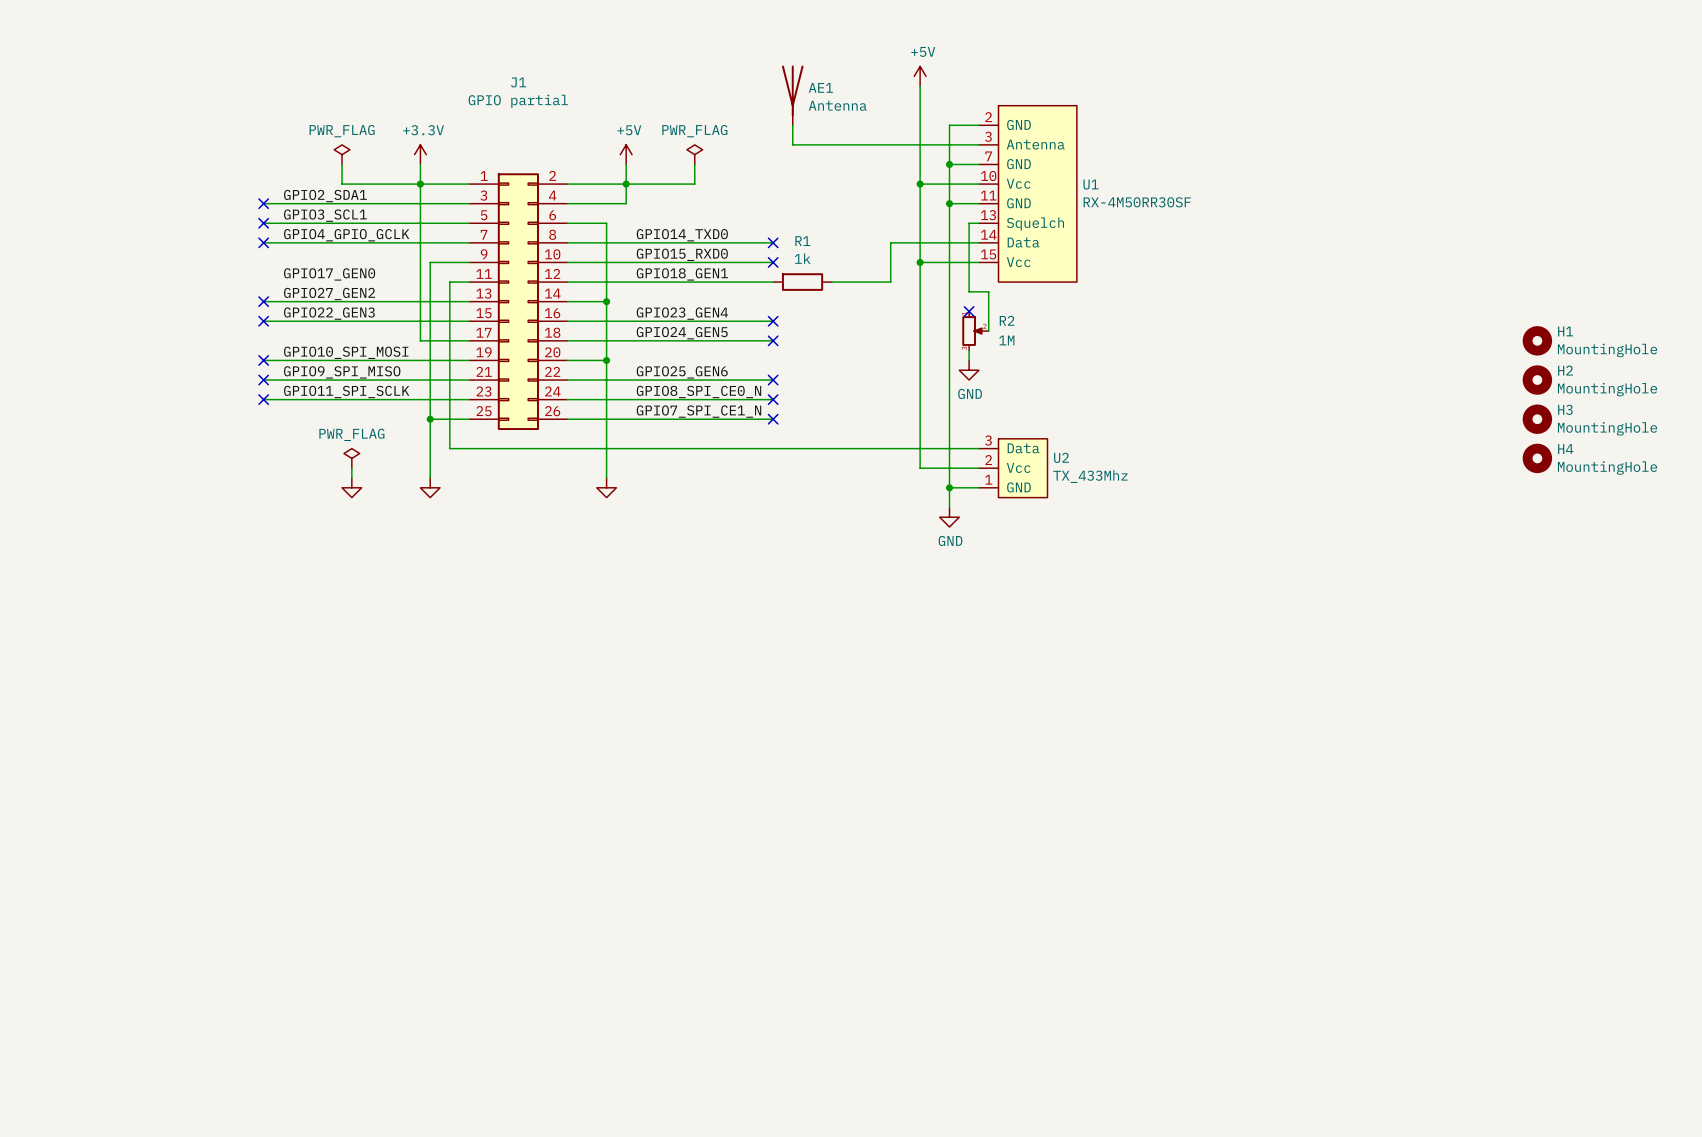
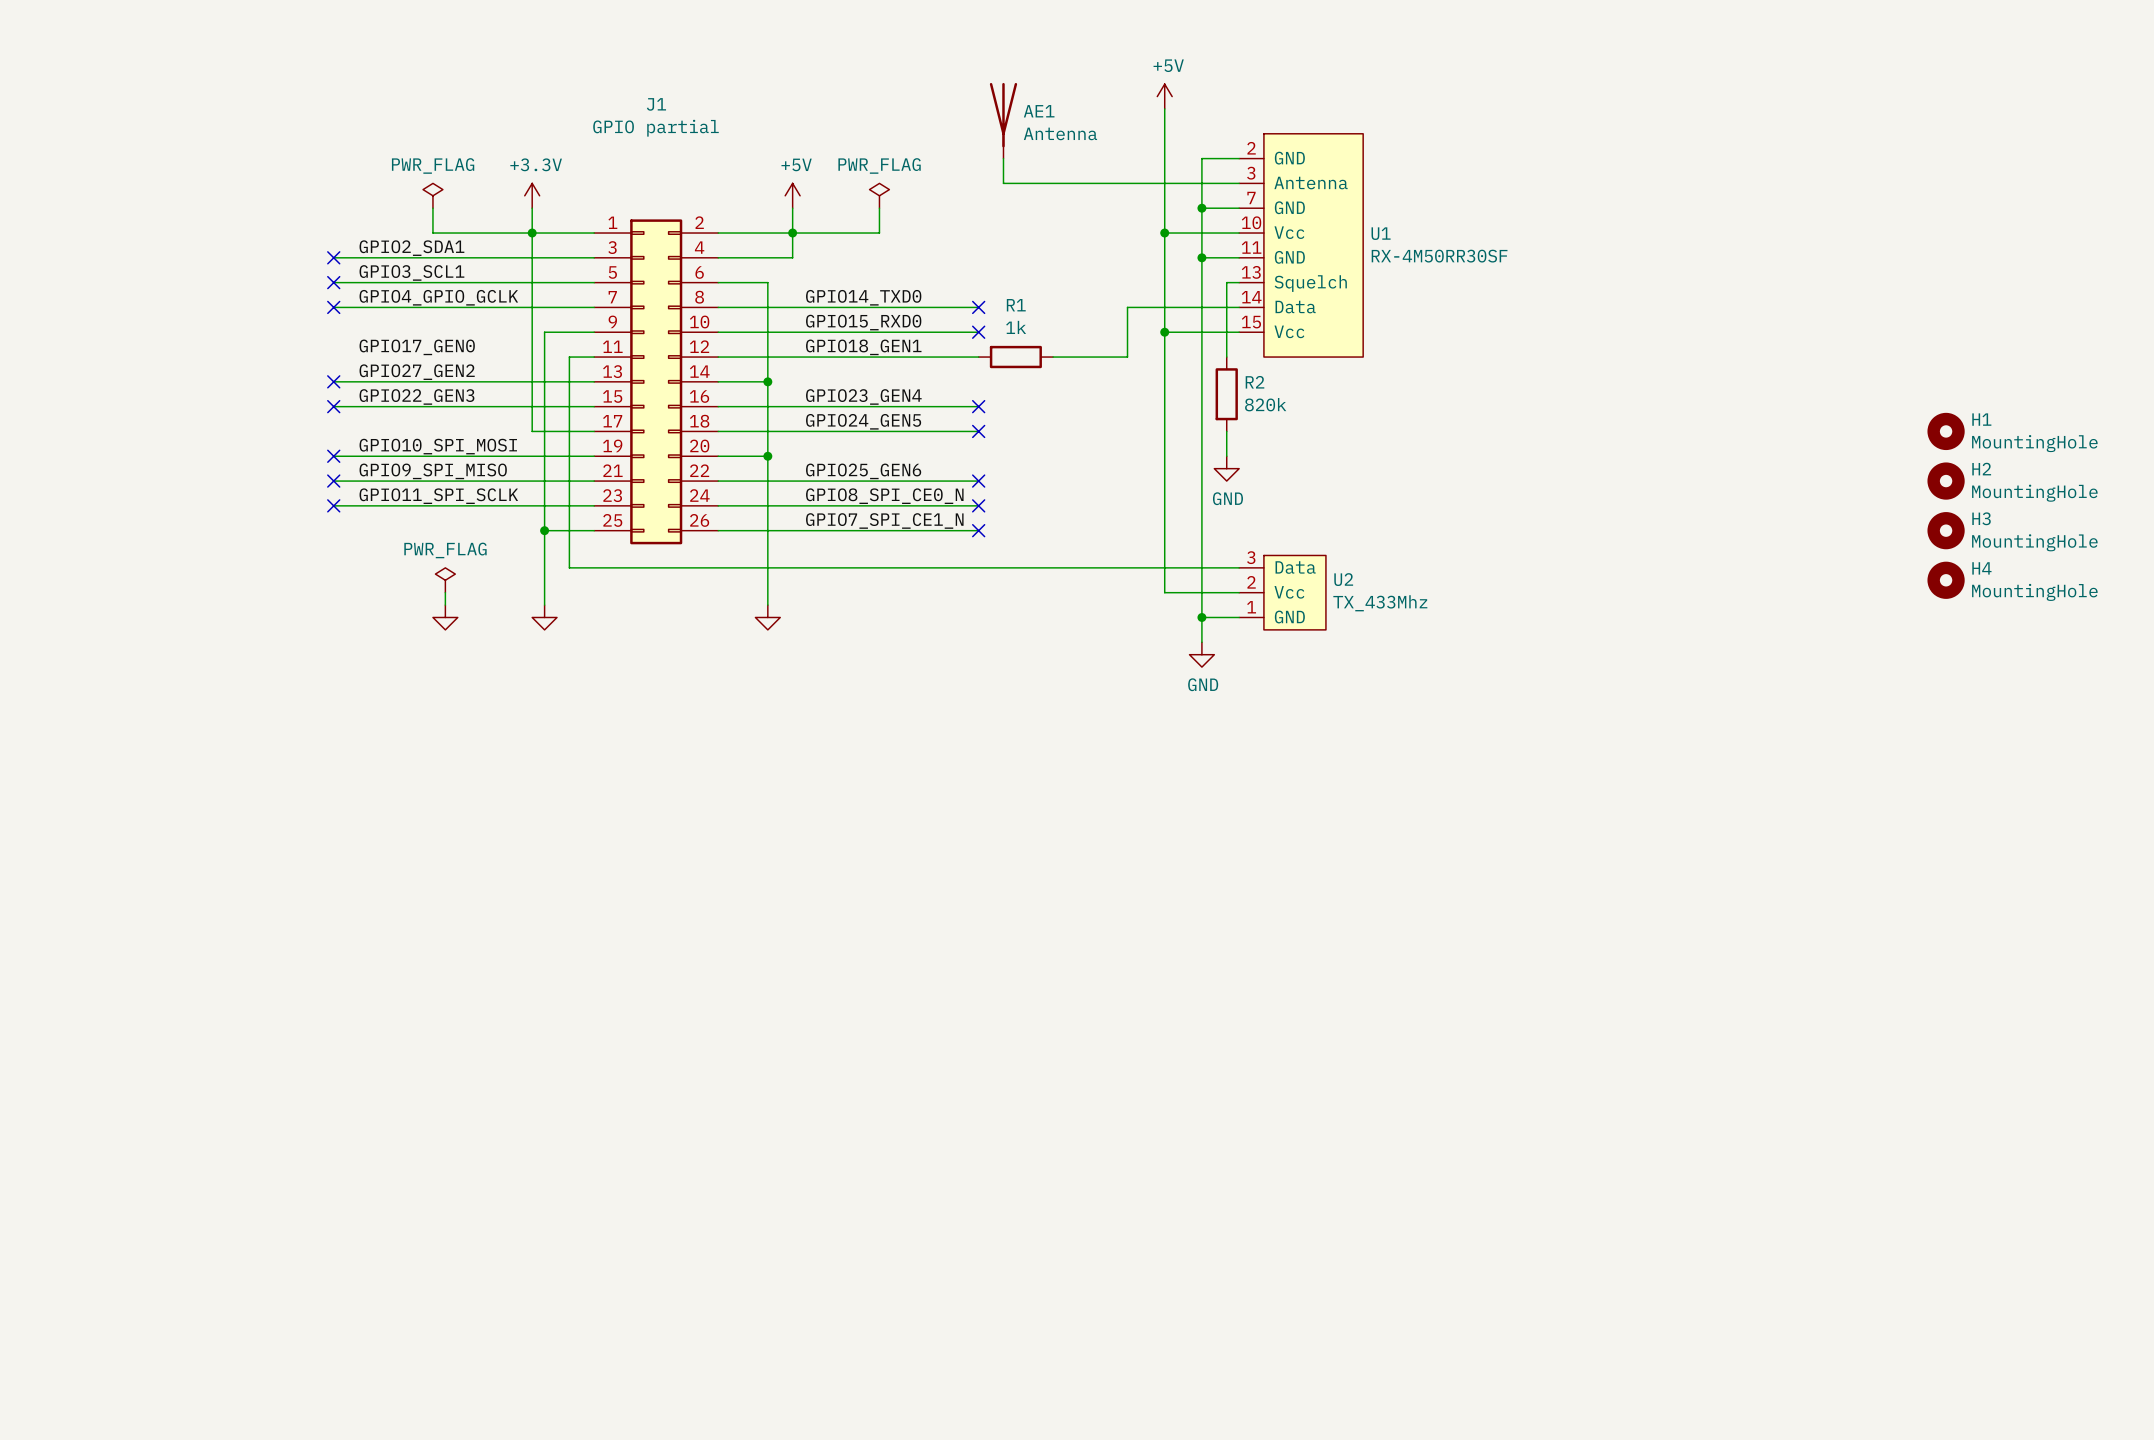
wire: (969, 282) (969, 291) (988, 291) (988, 331) -> none
R2 symbol: [962, 311, 989, 351] -> [1215, 357, 1238, 432]
no-connect mark: (969, 311) -> none
R2 value: 1M (1006, 340) -> 820k (1265, 404)

